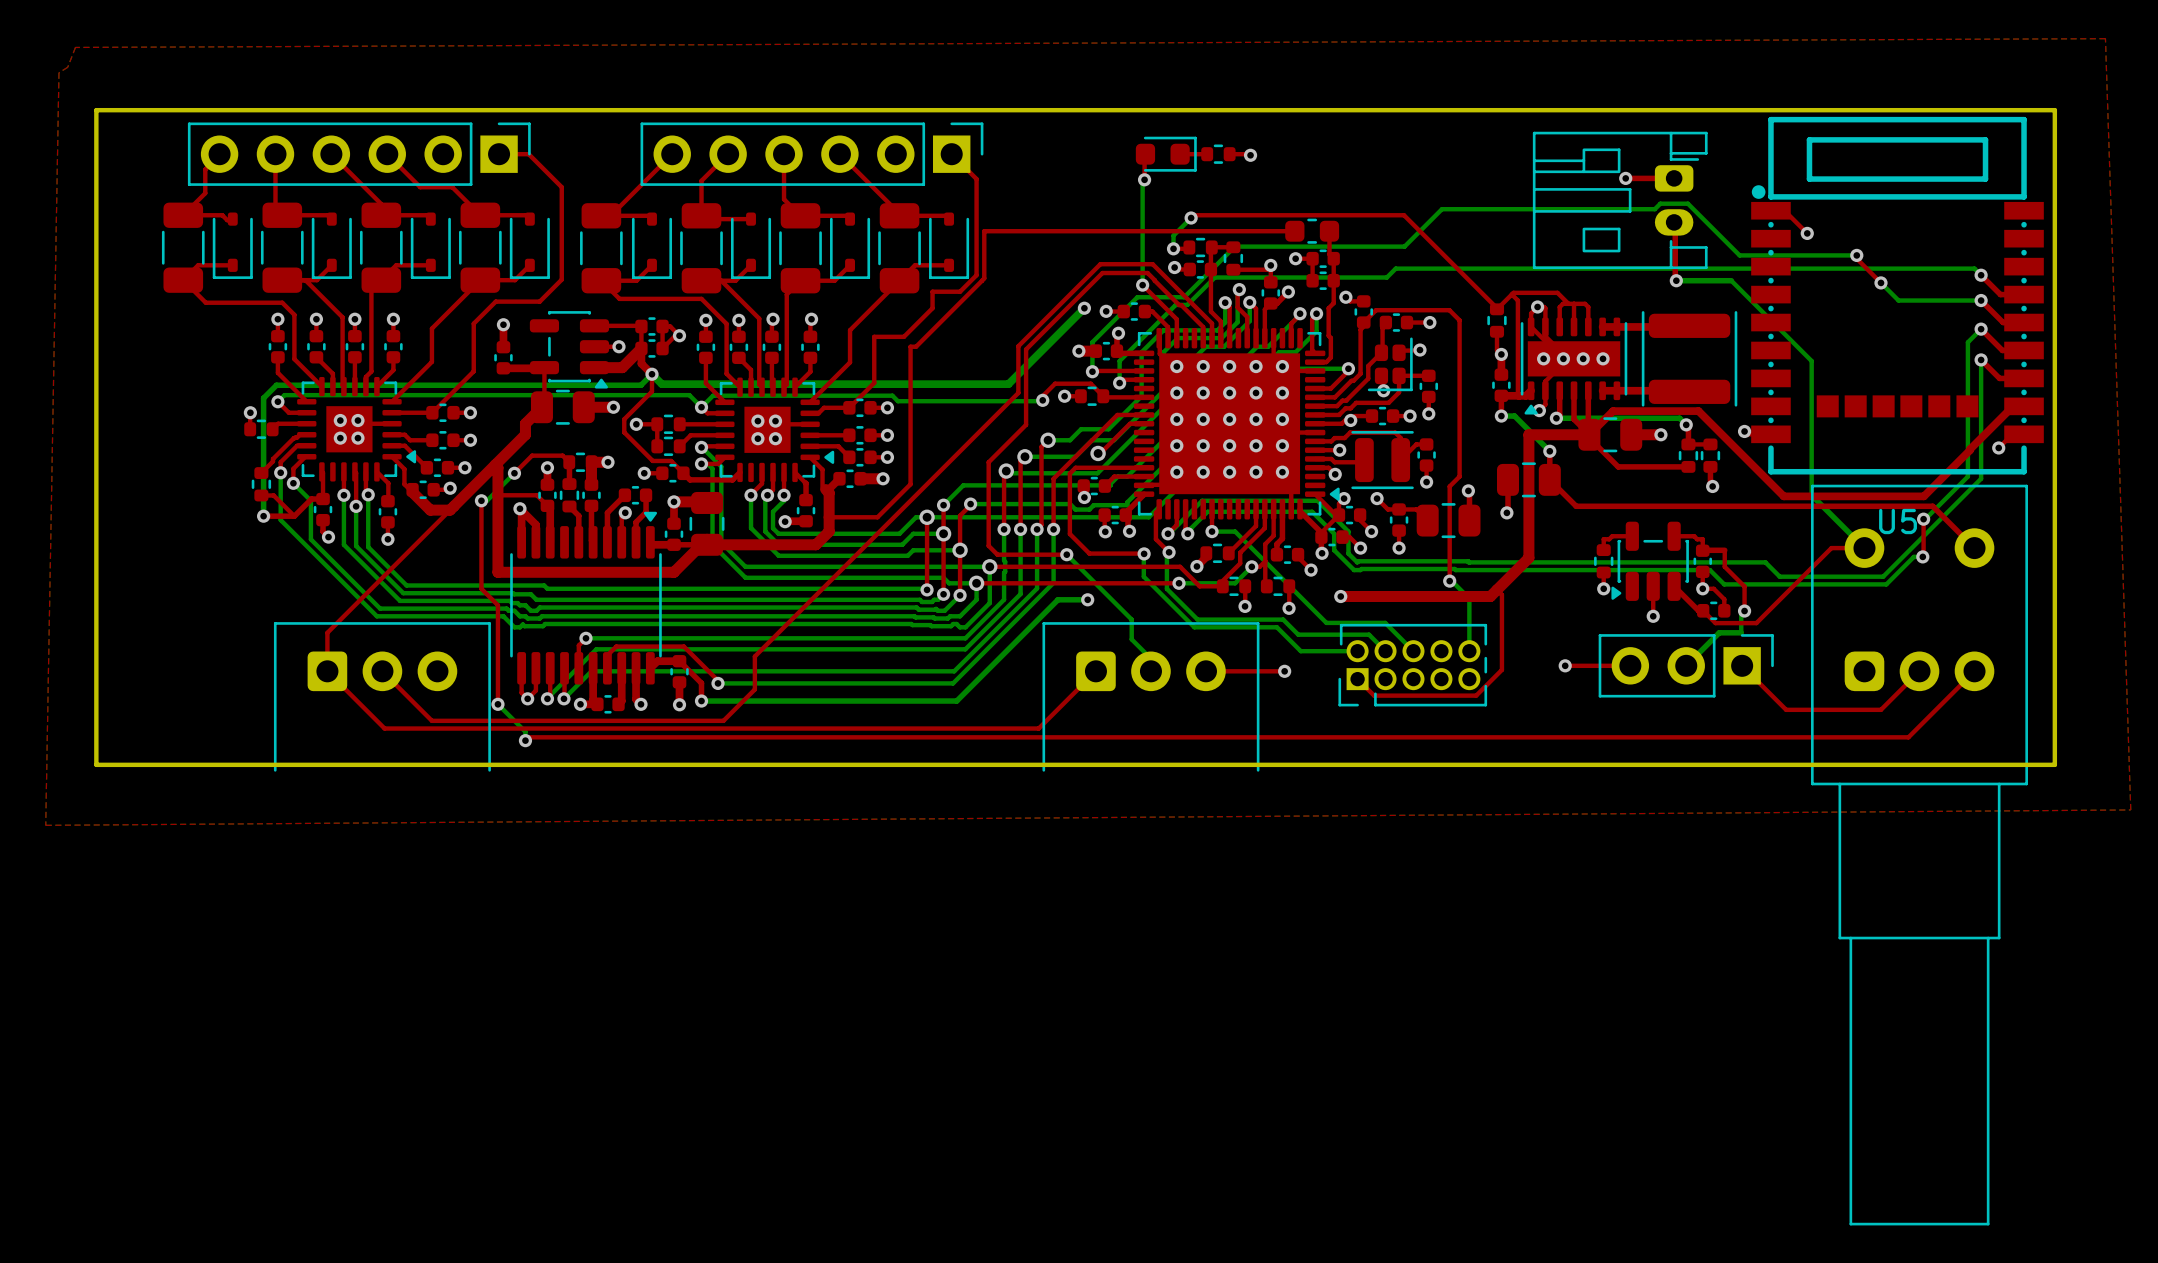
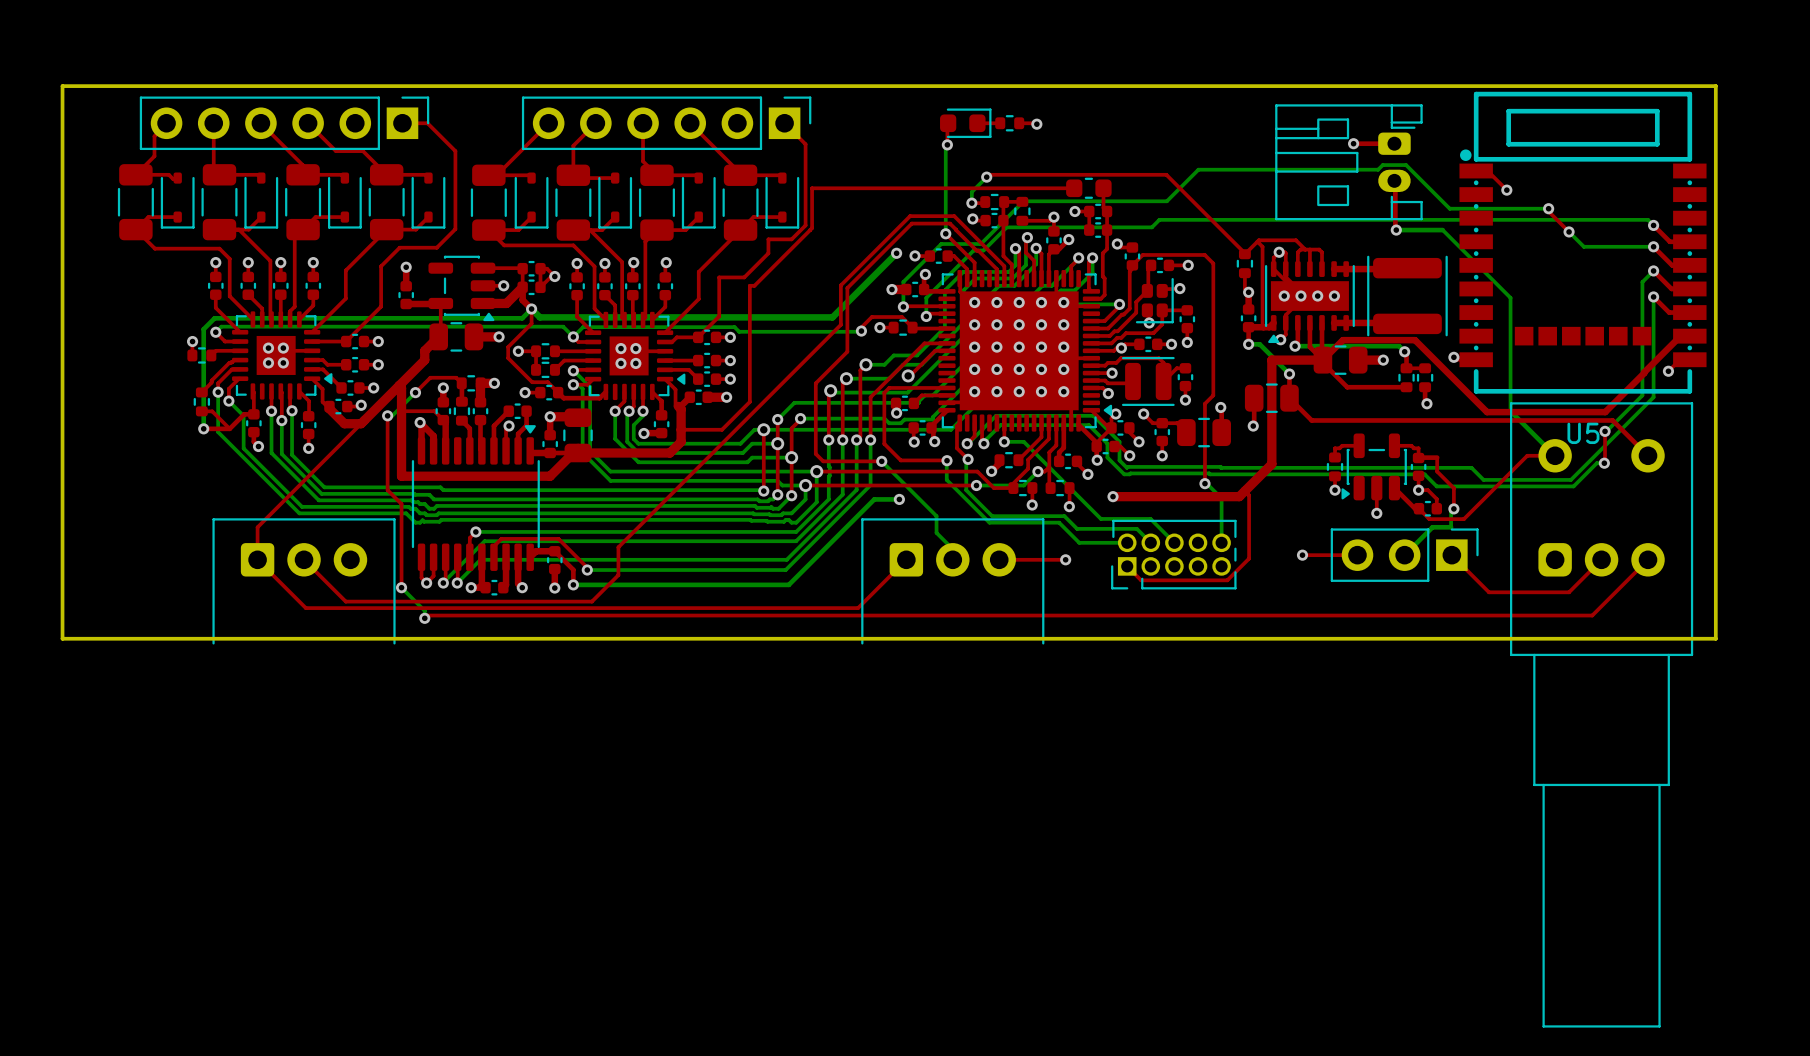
top zone outline: (2105, 38) (2130, 809) (45, 825) (58, 72) (67, 67) (75, 47) (2105, 38) -> none

